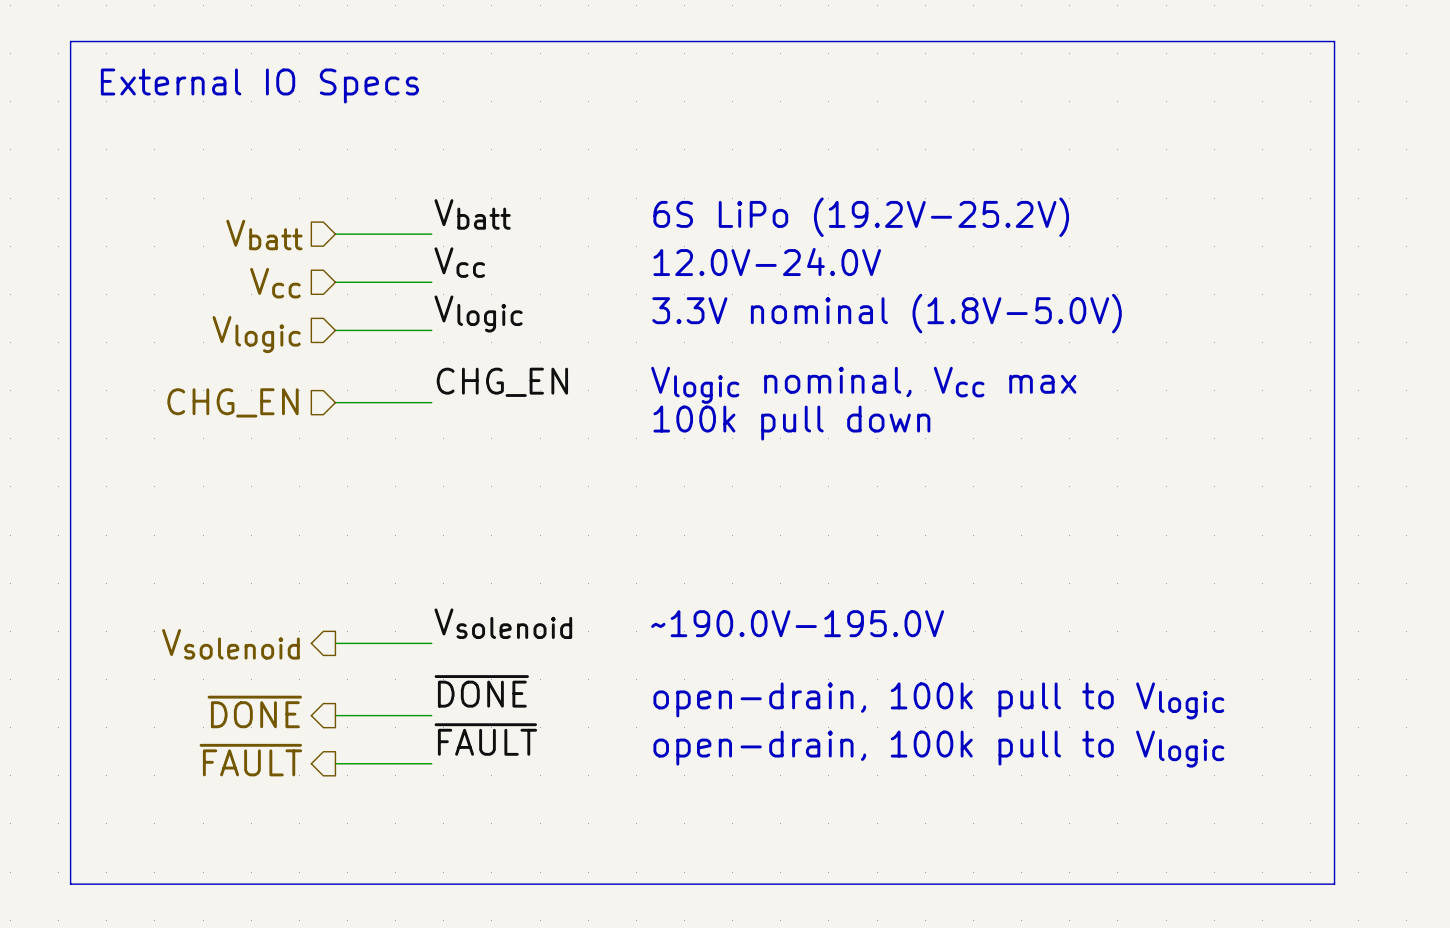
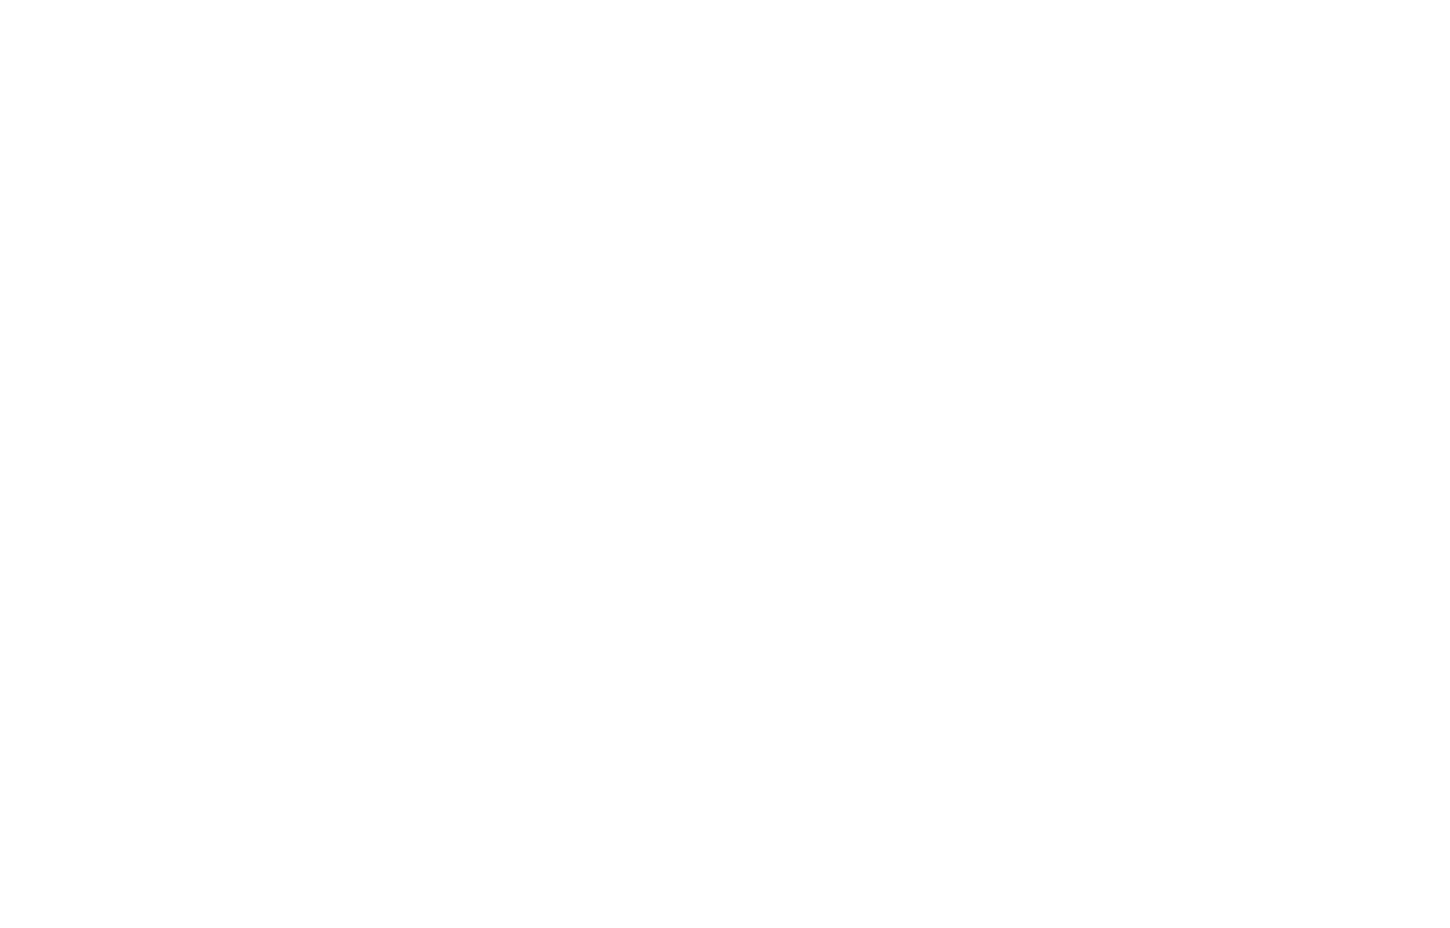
line: (70, 41) (1334, 41) (1334, 884) (70, 884) (70, 41) -> none
text: External IO Specs (259, 86) -> none
label: Vbatt (472, 214) -> none
text: 6S LiPo (19.2V-25.2V) (861, 217) -> none
wire: (335, 234) (431, 234) -> none
hierarchical label: Vbatt (264, 235) -> none
text: 12.0V-24.0V (767, 261) -> none
label: Vcc (459, 262) -> none
wire: (335, 282) (431, 282) -> none
hierarchical label: Vcc (275, 283) -> none
label: Vlogic (478, 313) -> none
text: 3.3V nominal (1.8V-5.0V) (887, 313) -> none
wire: (335, 330) (431, 330) -> none
hierarchical label: Vlogic (256, 334) -> none
label: CHG_EN (502, 382) -> none
text: Vlogic nominal, Vcc max (863, 385) -> none
hierarchical label: CHG_EN (233, 402) -> none
wire: (335, 402) (431, 402) -> none
text: 100k pull down (791, 423) -> none
label: Vsolenoid (503, 623) -> none
text: ~190.0V-195.0V (797, 623) -> none
wire: (335, 643) (431, 643) -> none
hierarchical label: Vsolenoid (230, 644) -> none
label: ~{DONE} (481, 691) -> none
text: open-drain, 100k pull to Vlogic (938, 700) -> none
hierarchical label: ~{DONE} (254, 711) -> none
wire: (335, 715) (431, 715) -> none
label: ~{FAULT} (485, 739) -> none
text: open-drain, 100k pull to Vlogic (938, 749) -> none
hierarchical label: ~{FAULT} (250, 760) -> none
wire: (335, 763) (431, 763) -> none

